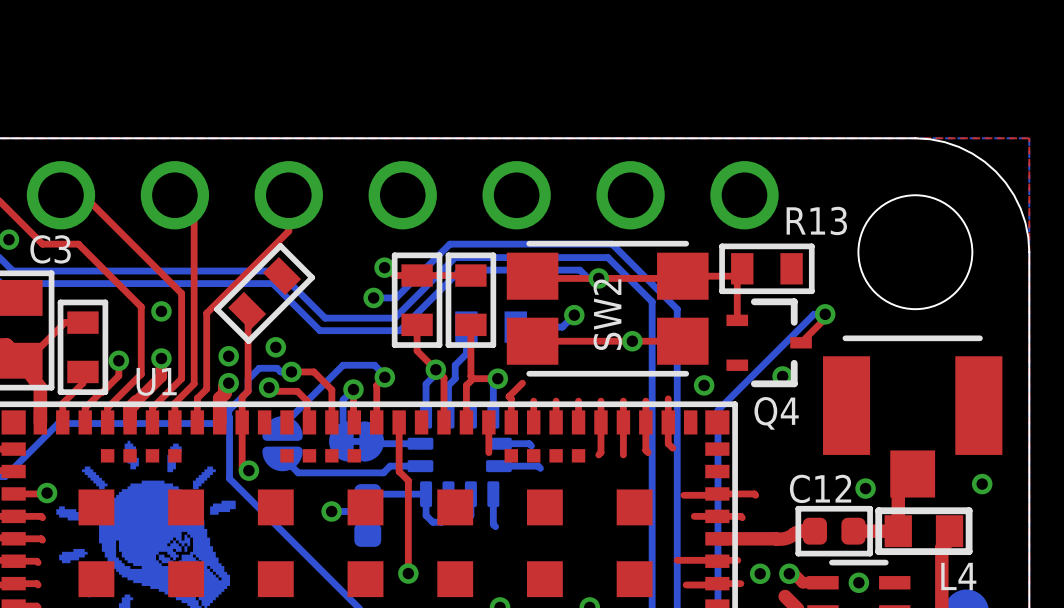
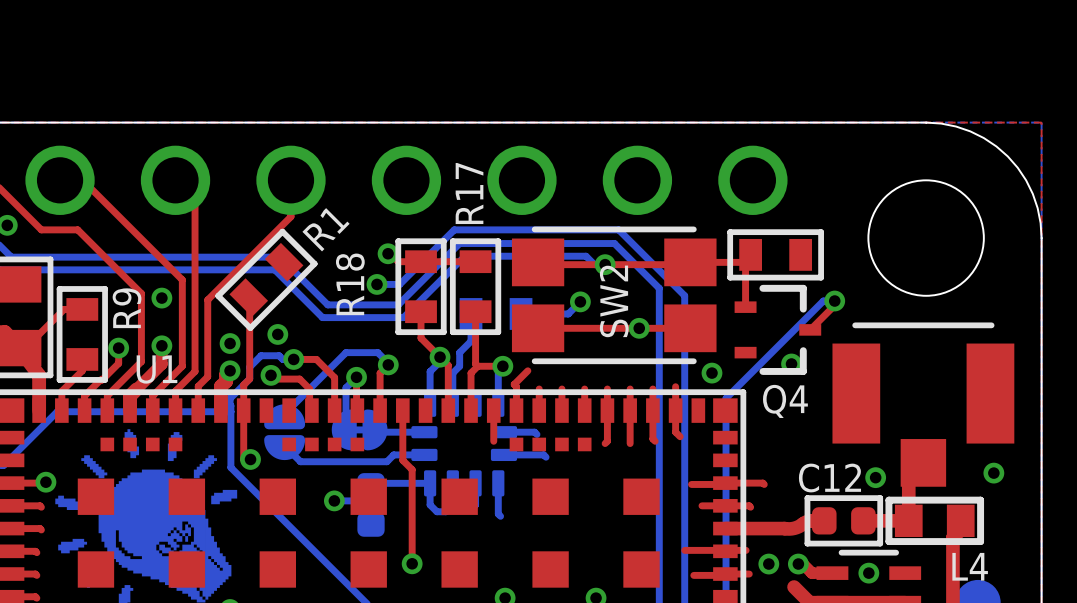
R17 name: none -> R17 (469, 193)
R13 name: R13 (816, 220) -> none
R1 name: none -> R1 (326, 229)
C3 name: C3 (50, 249) -> none
R18 name: none -> R18 (350, 284)
R9 name: none -> R9 (127, 308)

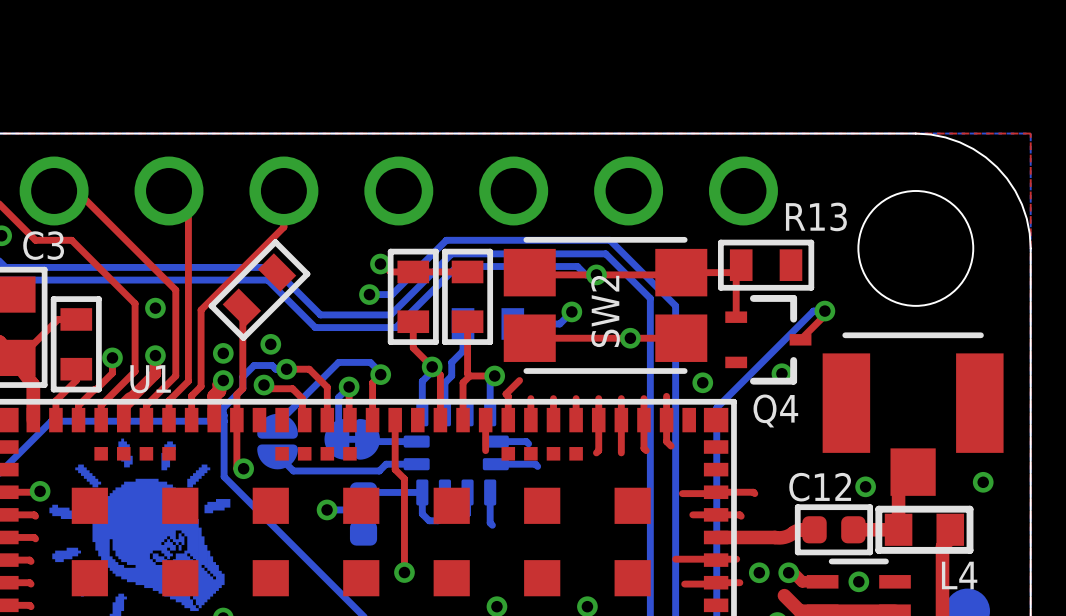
R17 name: R17 (469, 193) -> none
R13 name: none -> R13 (816, 216)
R1 name: R1 (326, 229) -> none
C3 name: none -> C3 (43, 245)
R18 name: R18 (350, 284) -> none
R9 name: R9 (127, 308) -> none

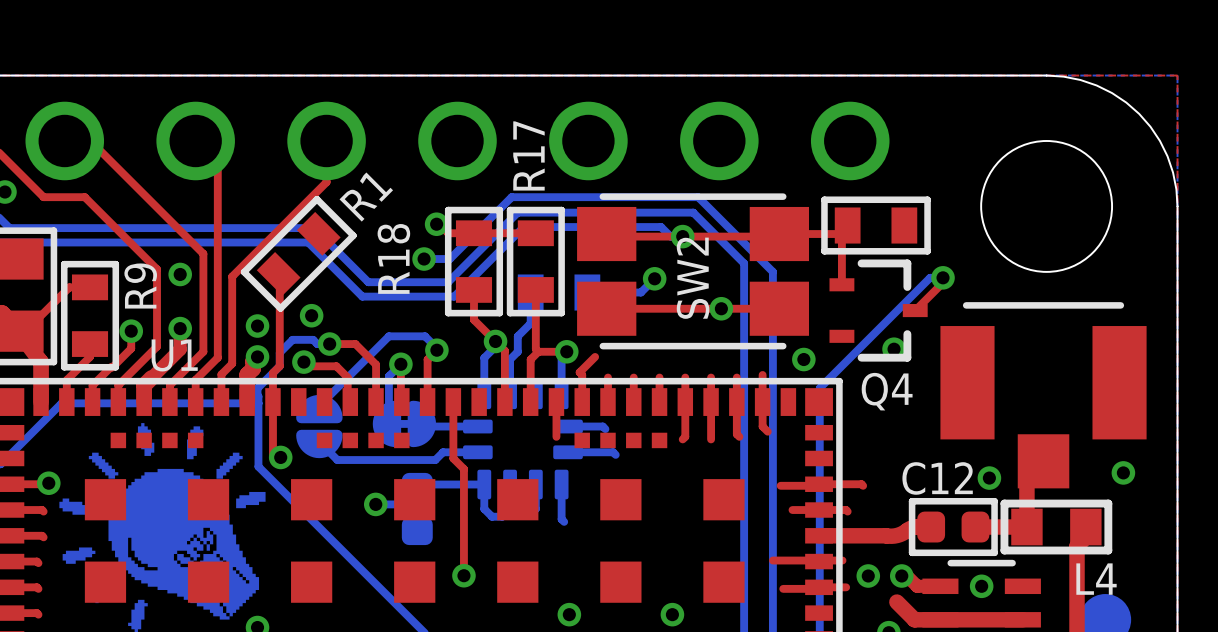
R17 name: none -> R17 (528, 155)
R13 name: R13 (816, 216) -> none
R1 name: none -> R1 (366, 197)
C3 name: C3 (43, 245) -> none
R18 name: none -> R18 (393, 258)
R9 name: none -> R9 (140, 286)

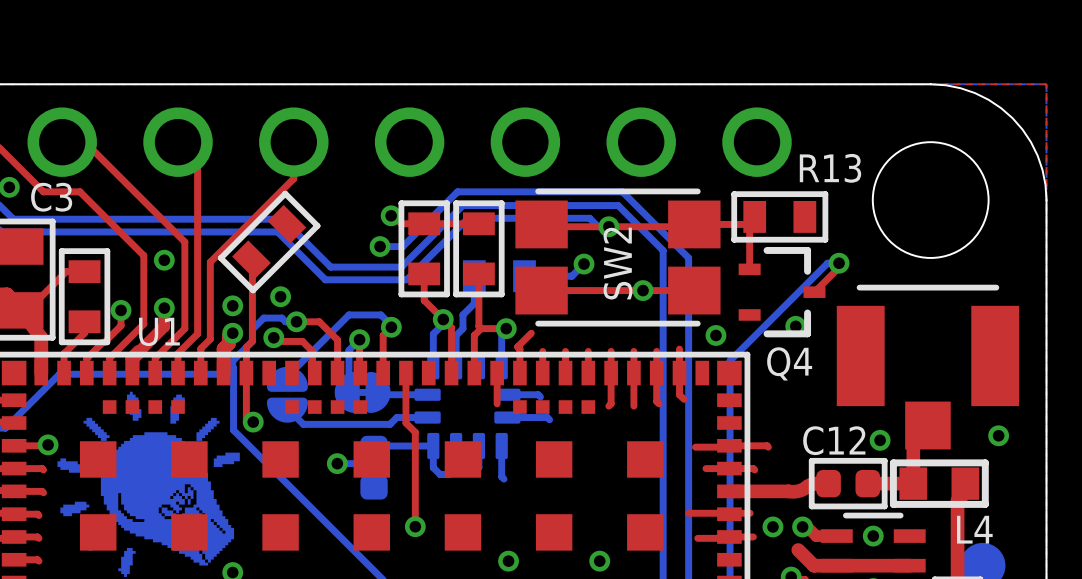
R17 name: R17 (528, 155) -> none
R13 name: none -> R13 (830, 168)
R1 name: R1 (366, 197) -> none
C3 name: none -> C3 (51, 197)
R18 name: R18 (393, 258) -> none
R9 name: R9 (140, 286) -> none

